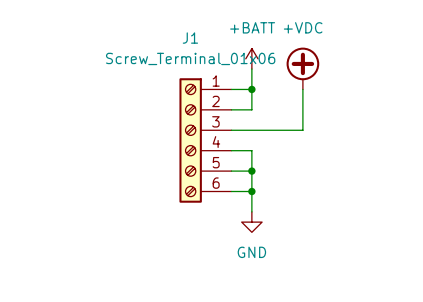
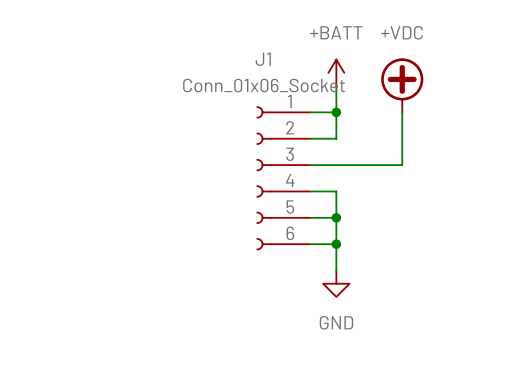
J1 value: Screw_Terminal_01x06 (190, 58) -> Conn_01x06_Socket (264, 85)
J1 symbol: [179, 78, 232, 203] -> [256, 106, 310, 251]

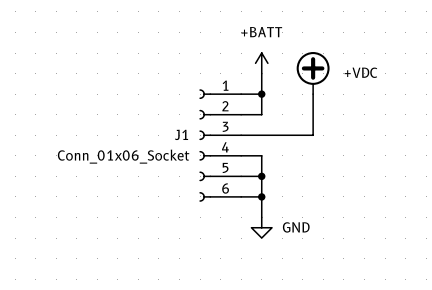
power symbol text position: +VDC (402, 32) -> +VDC (360, 72)
J1 name position: J1 (263, 59) -> J1 (181, 134)
J1 value position: Conn_01x06_Socket (264, 85) -> Conn_01x06_Socket (123, 156)
power symbol text position: GND (336, 322) -> GND (296, 227)

